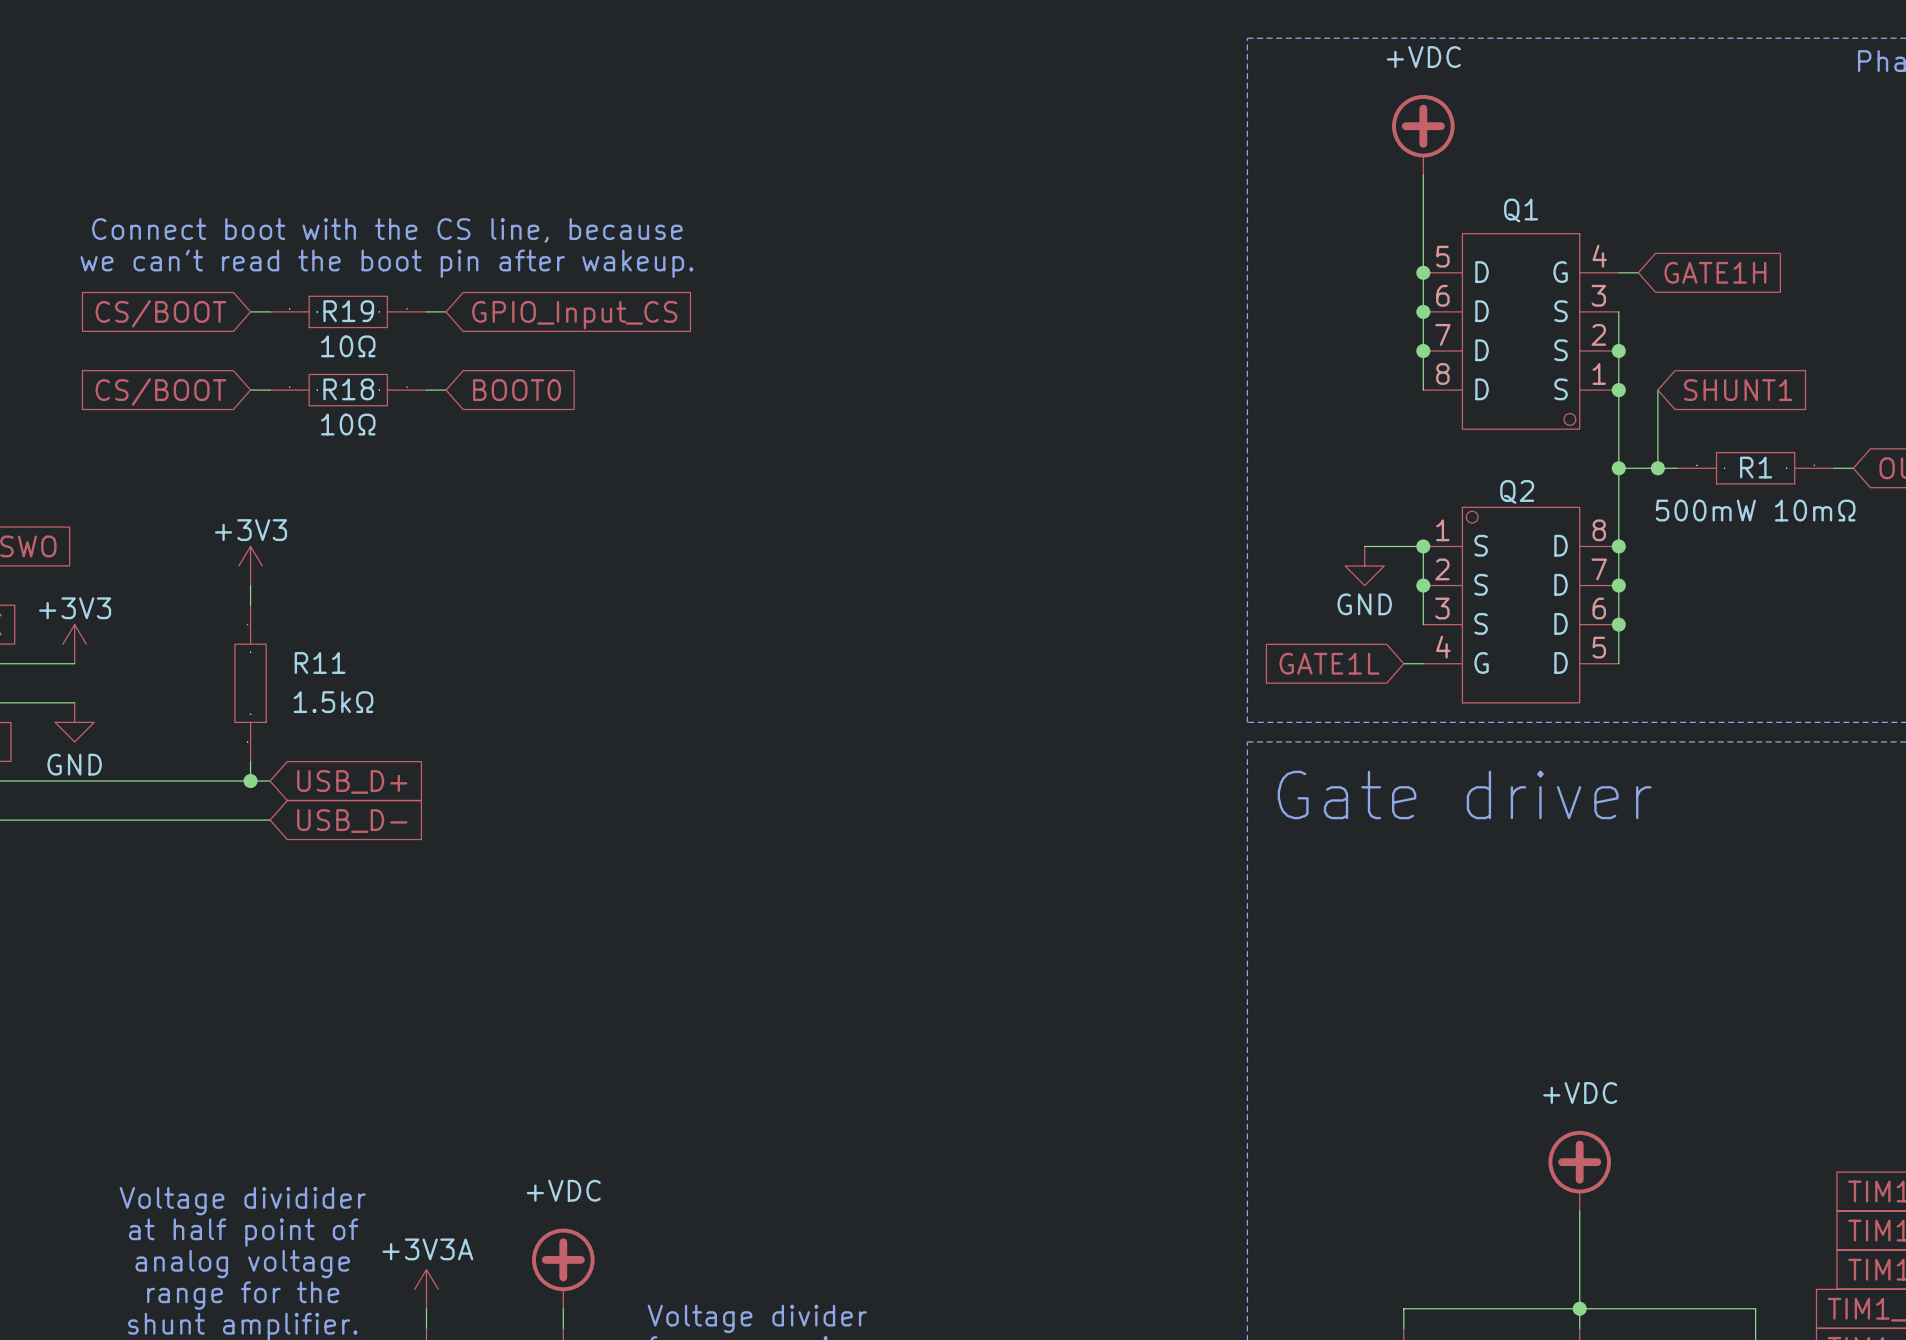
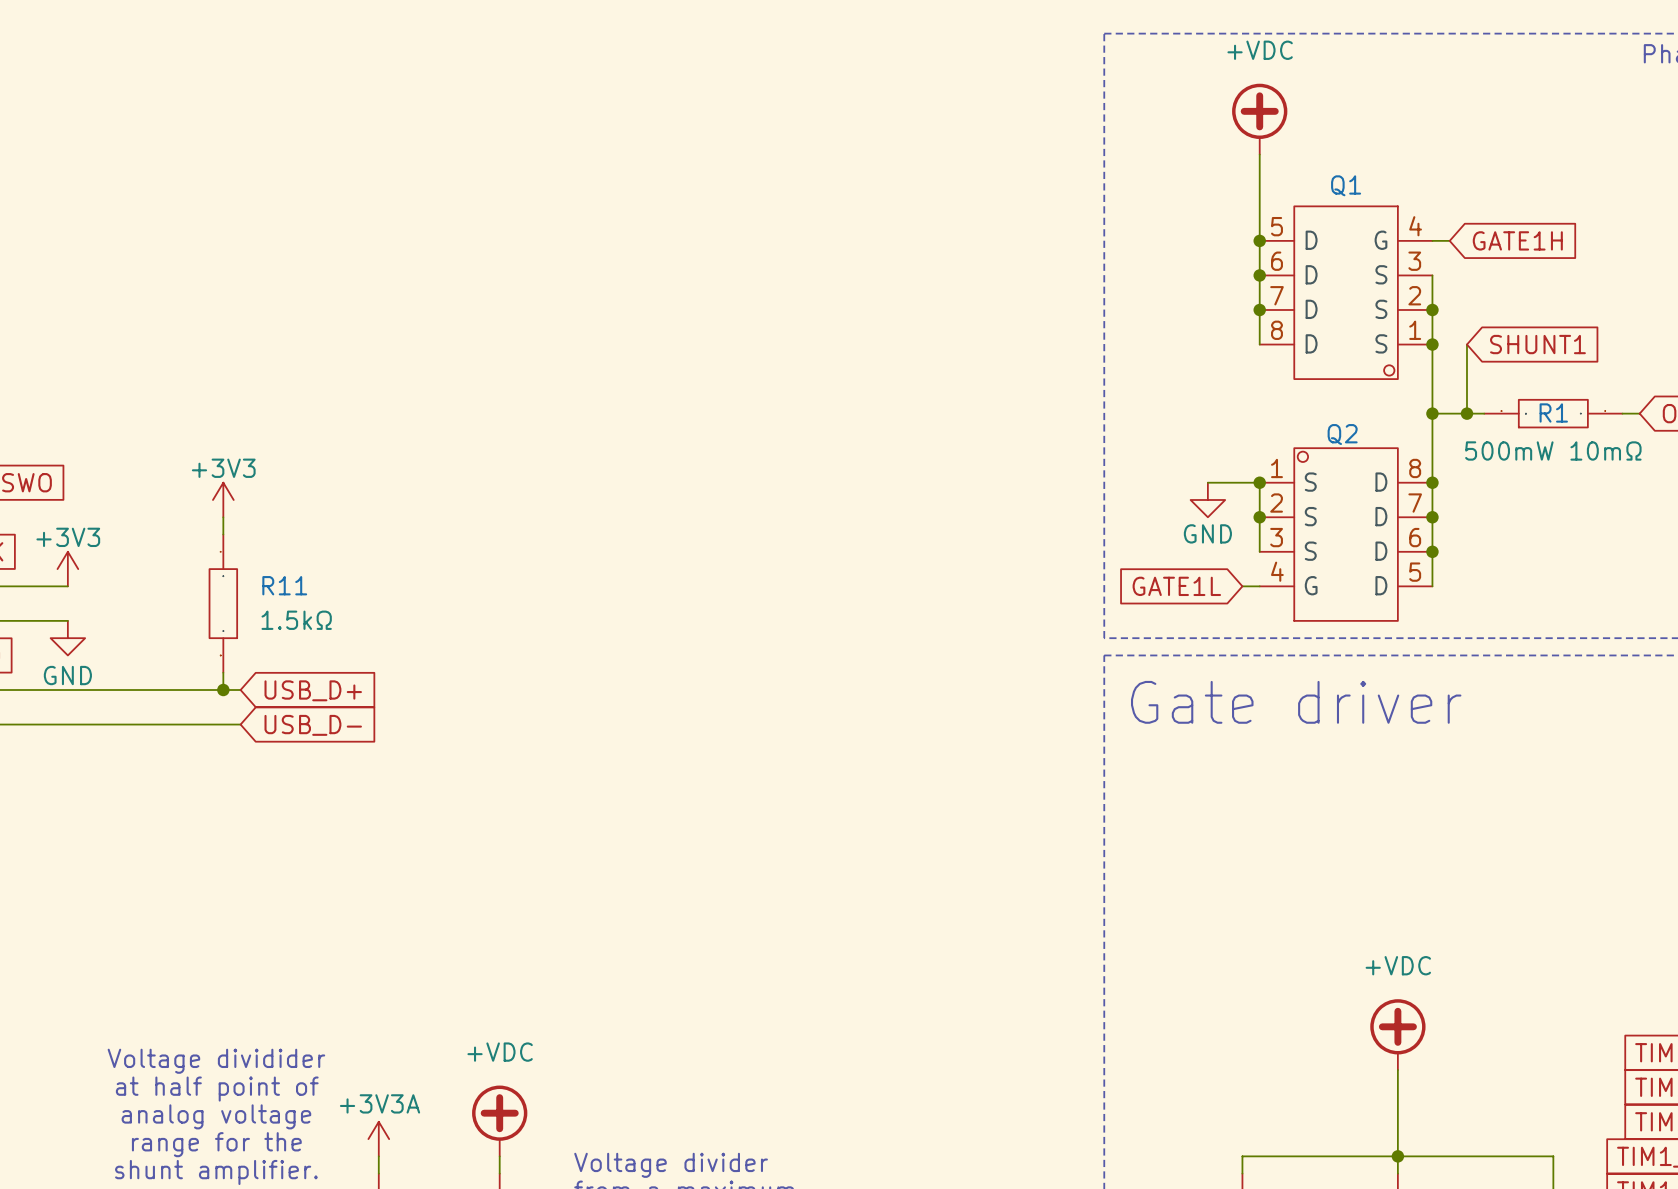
text: Connect boot with the CS line, because (387, 230) -> none
text: we can't read the boot pin after wakeup. (386, 263) -> none
wire: (250, 311) (270, 311) -> none
R19: 10Ω (348, 311) -> none
wire: (426, 311) (446, 311) -> none
global label: CS/BOOT (160, 313) -> none
global label: GPIO_Input_CS (574, 315) -> none
wire: (250, 390) (270, 390) -> none
R18: 10Ω (348, 390) -> none
wire: (426, 390) (446, 390) -> none
global label: BOOT0 (517, 390) -> none
global label: CS/BOOT (160, 391) -> none

